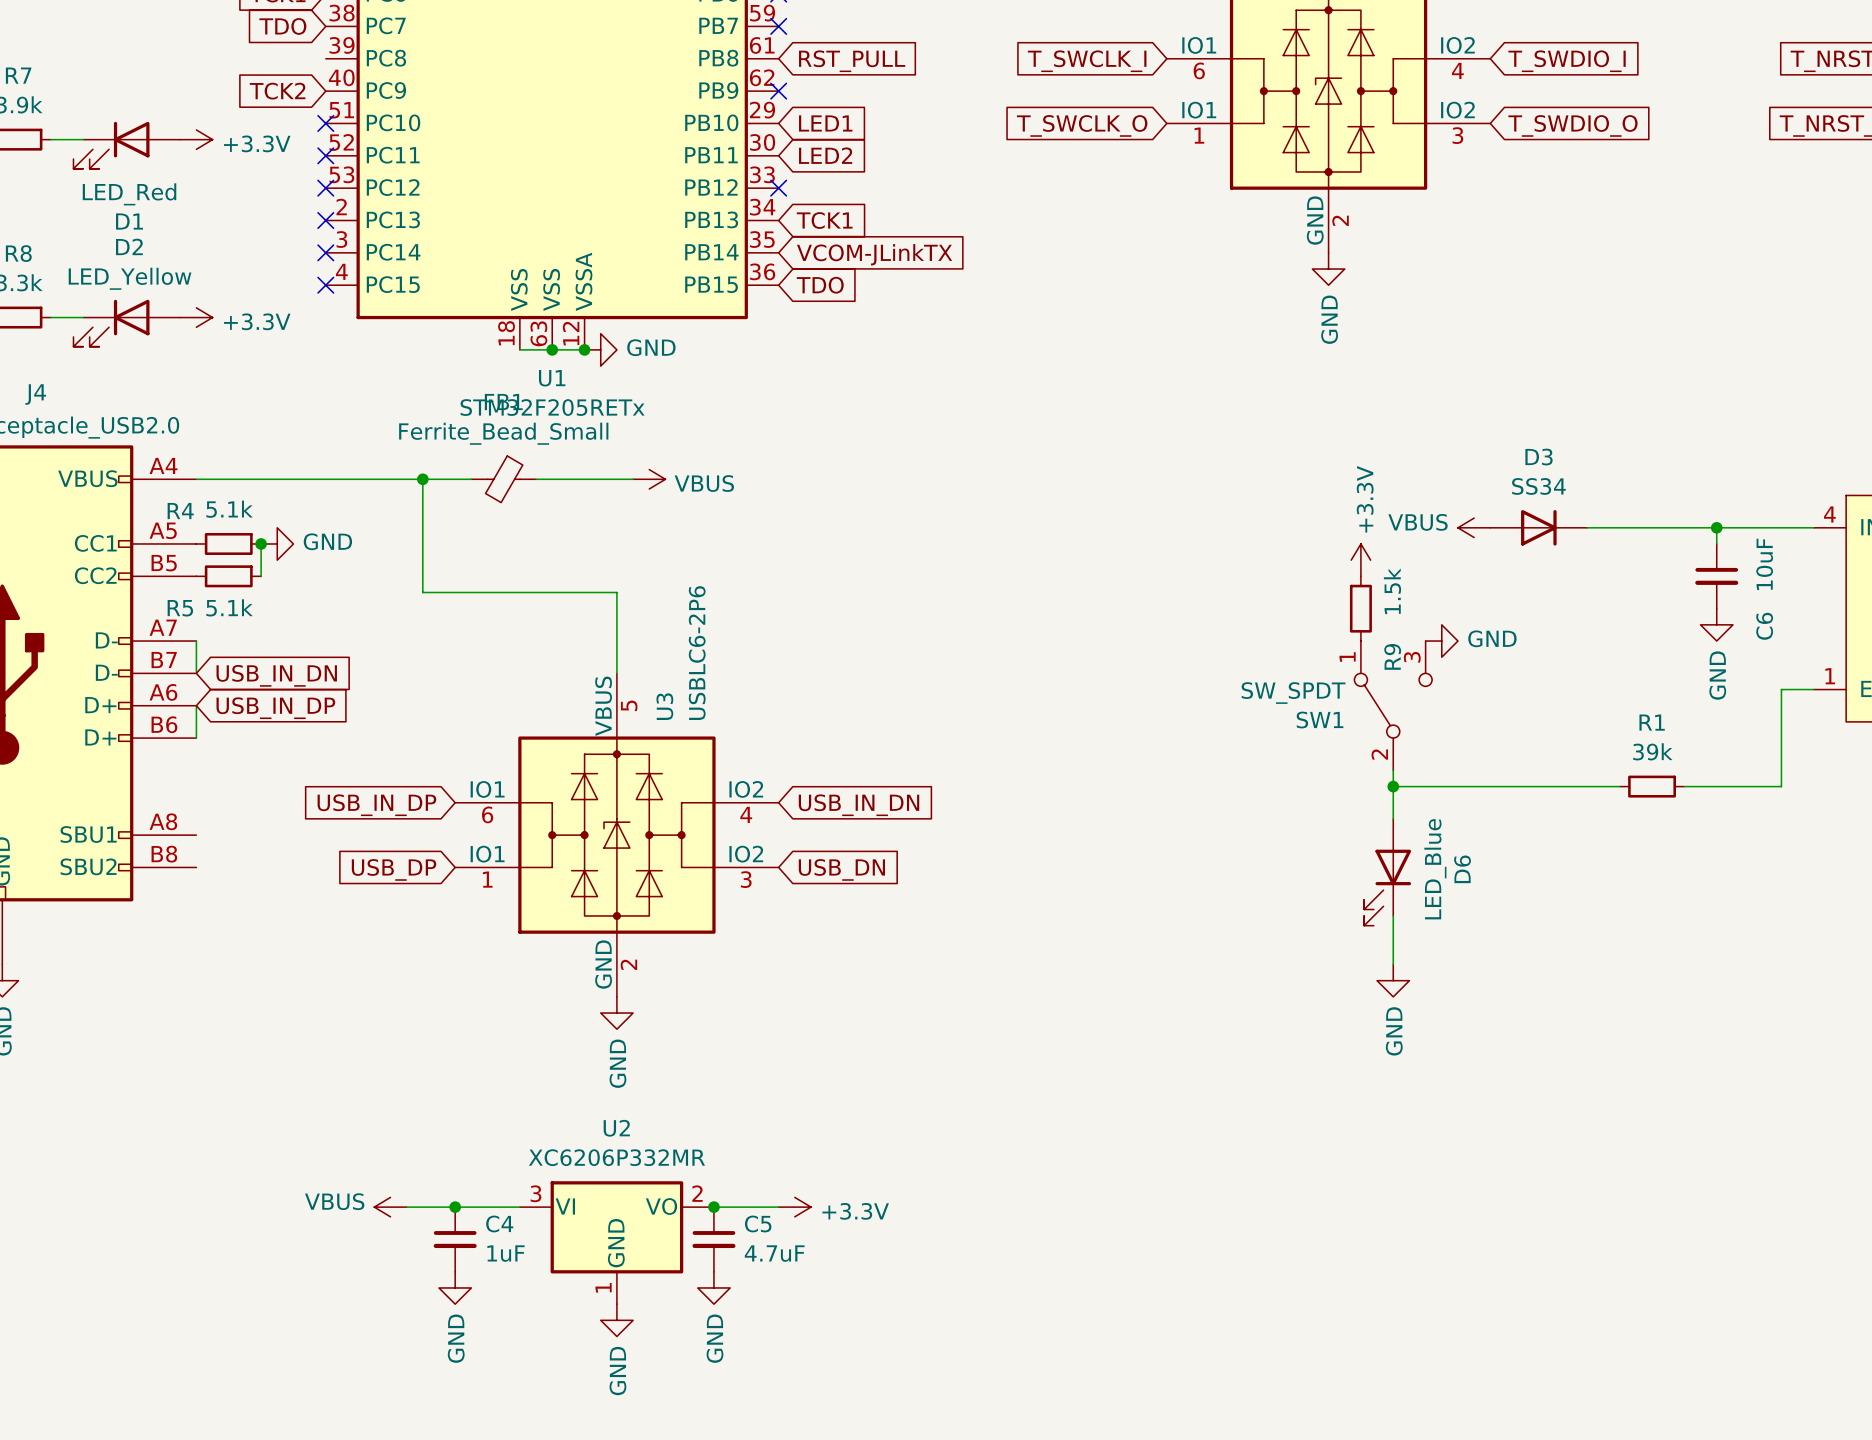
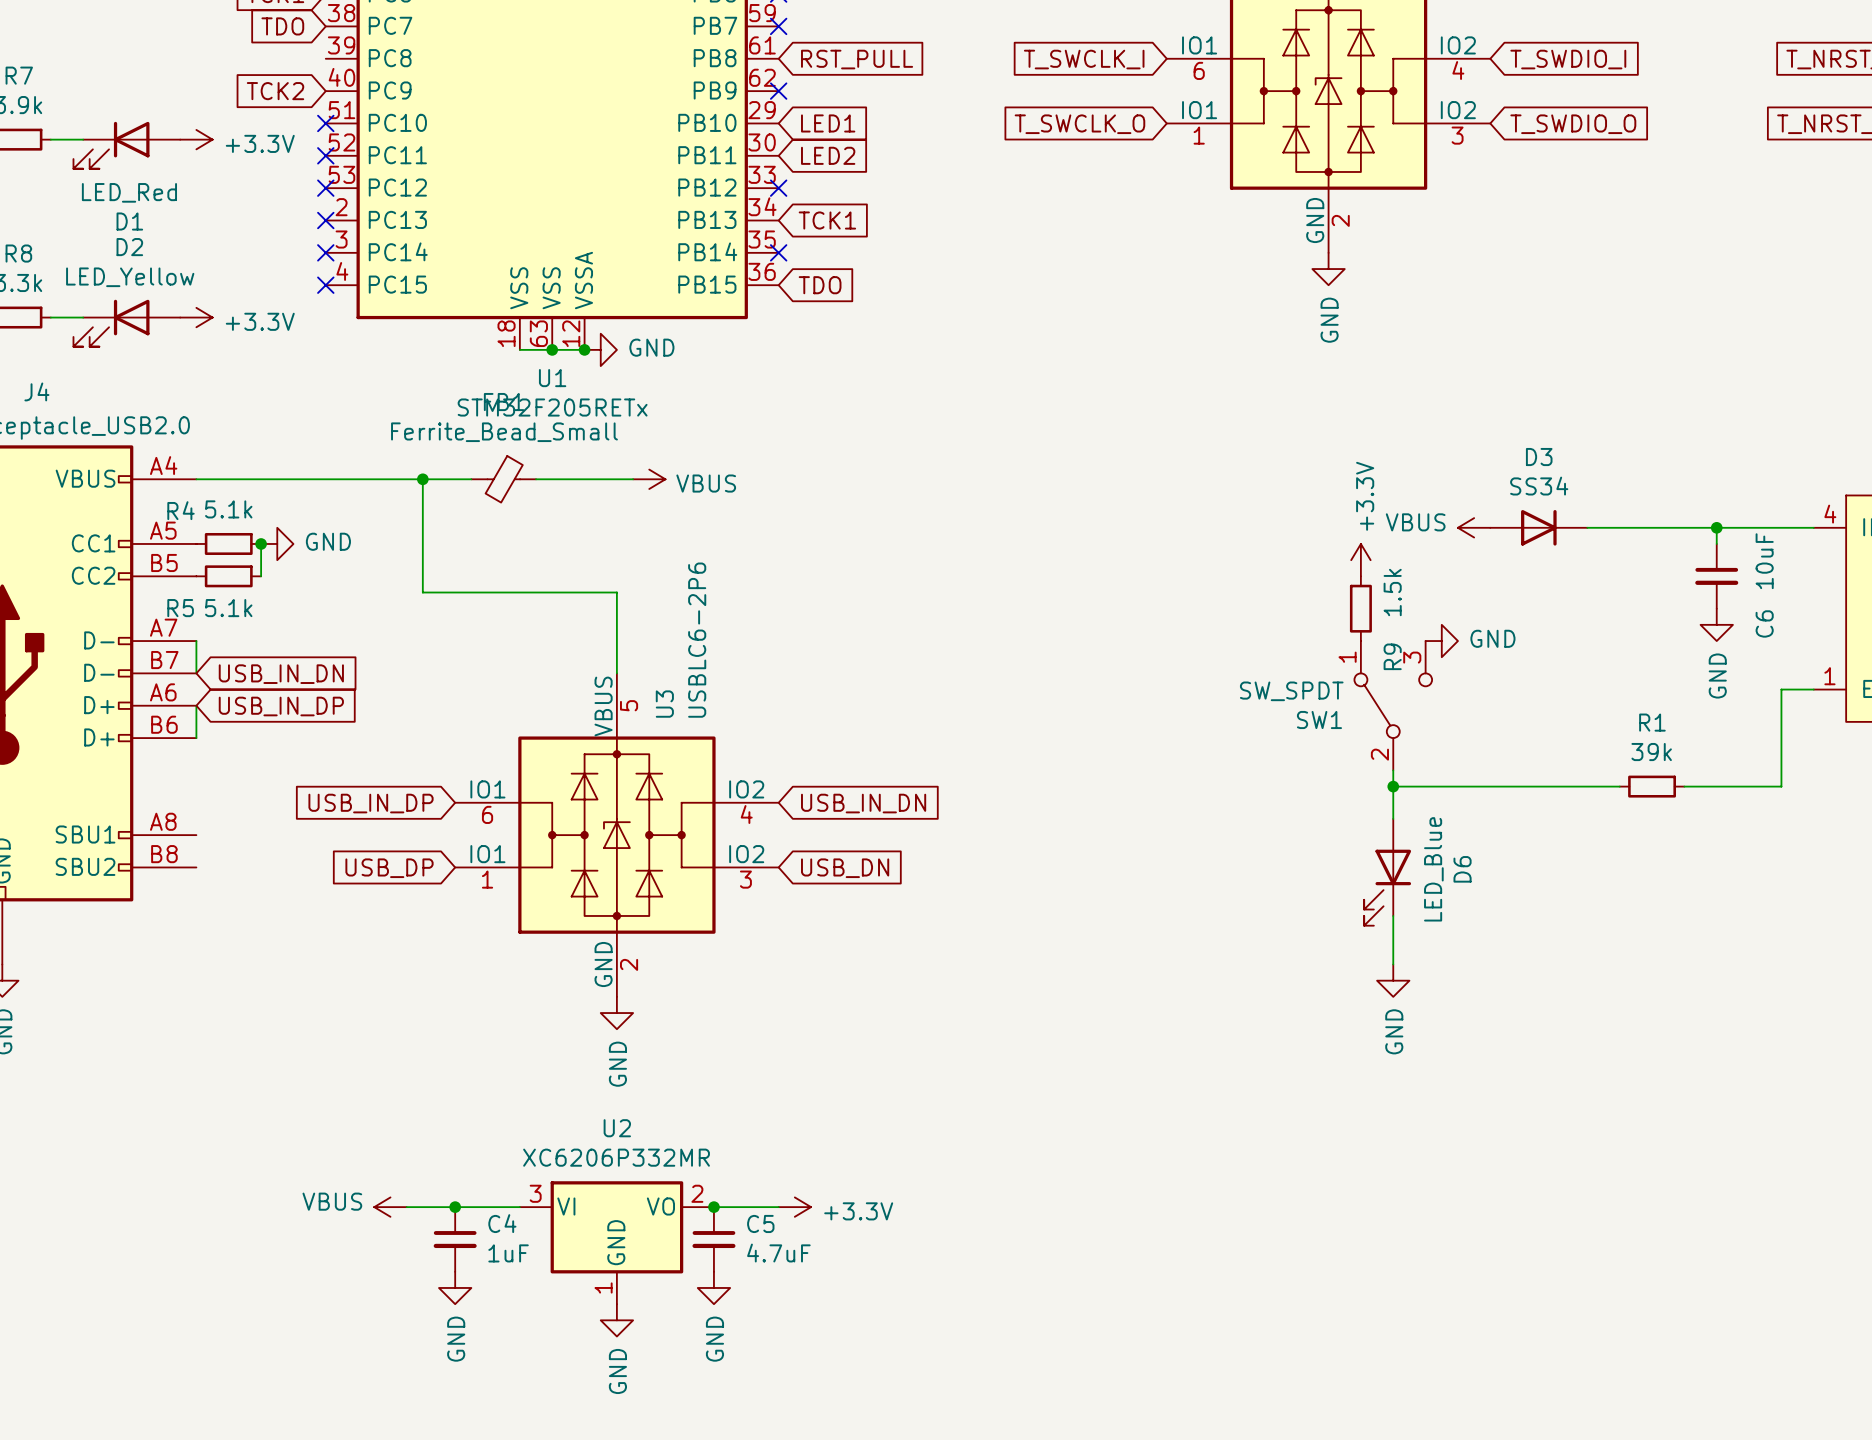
no-connect mark: none -> (778, 252)
global label: VCOM-JLinkTX (874, 254) -> none

